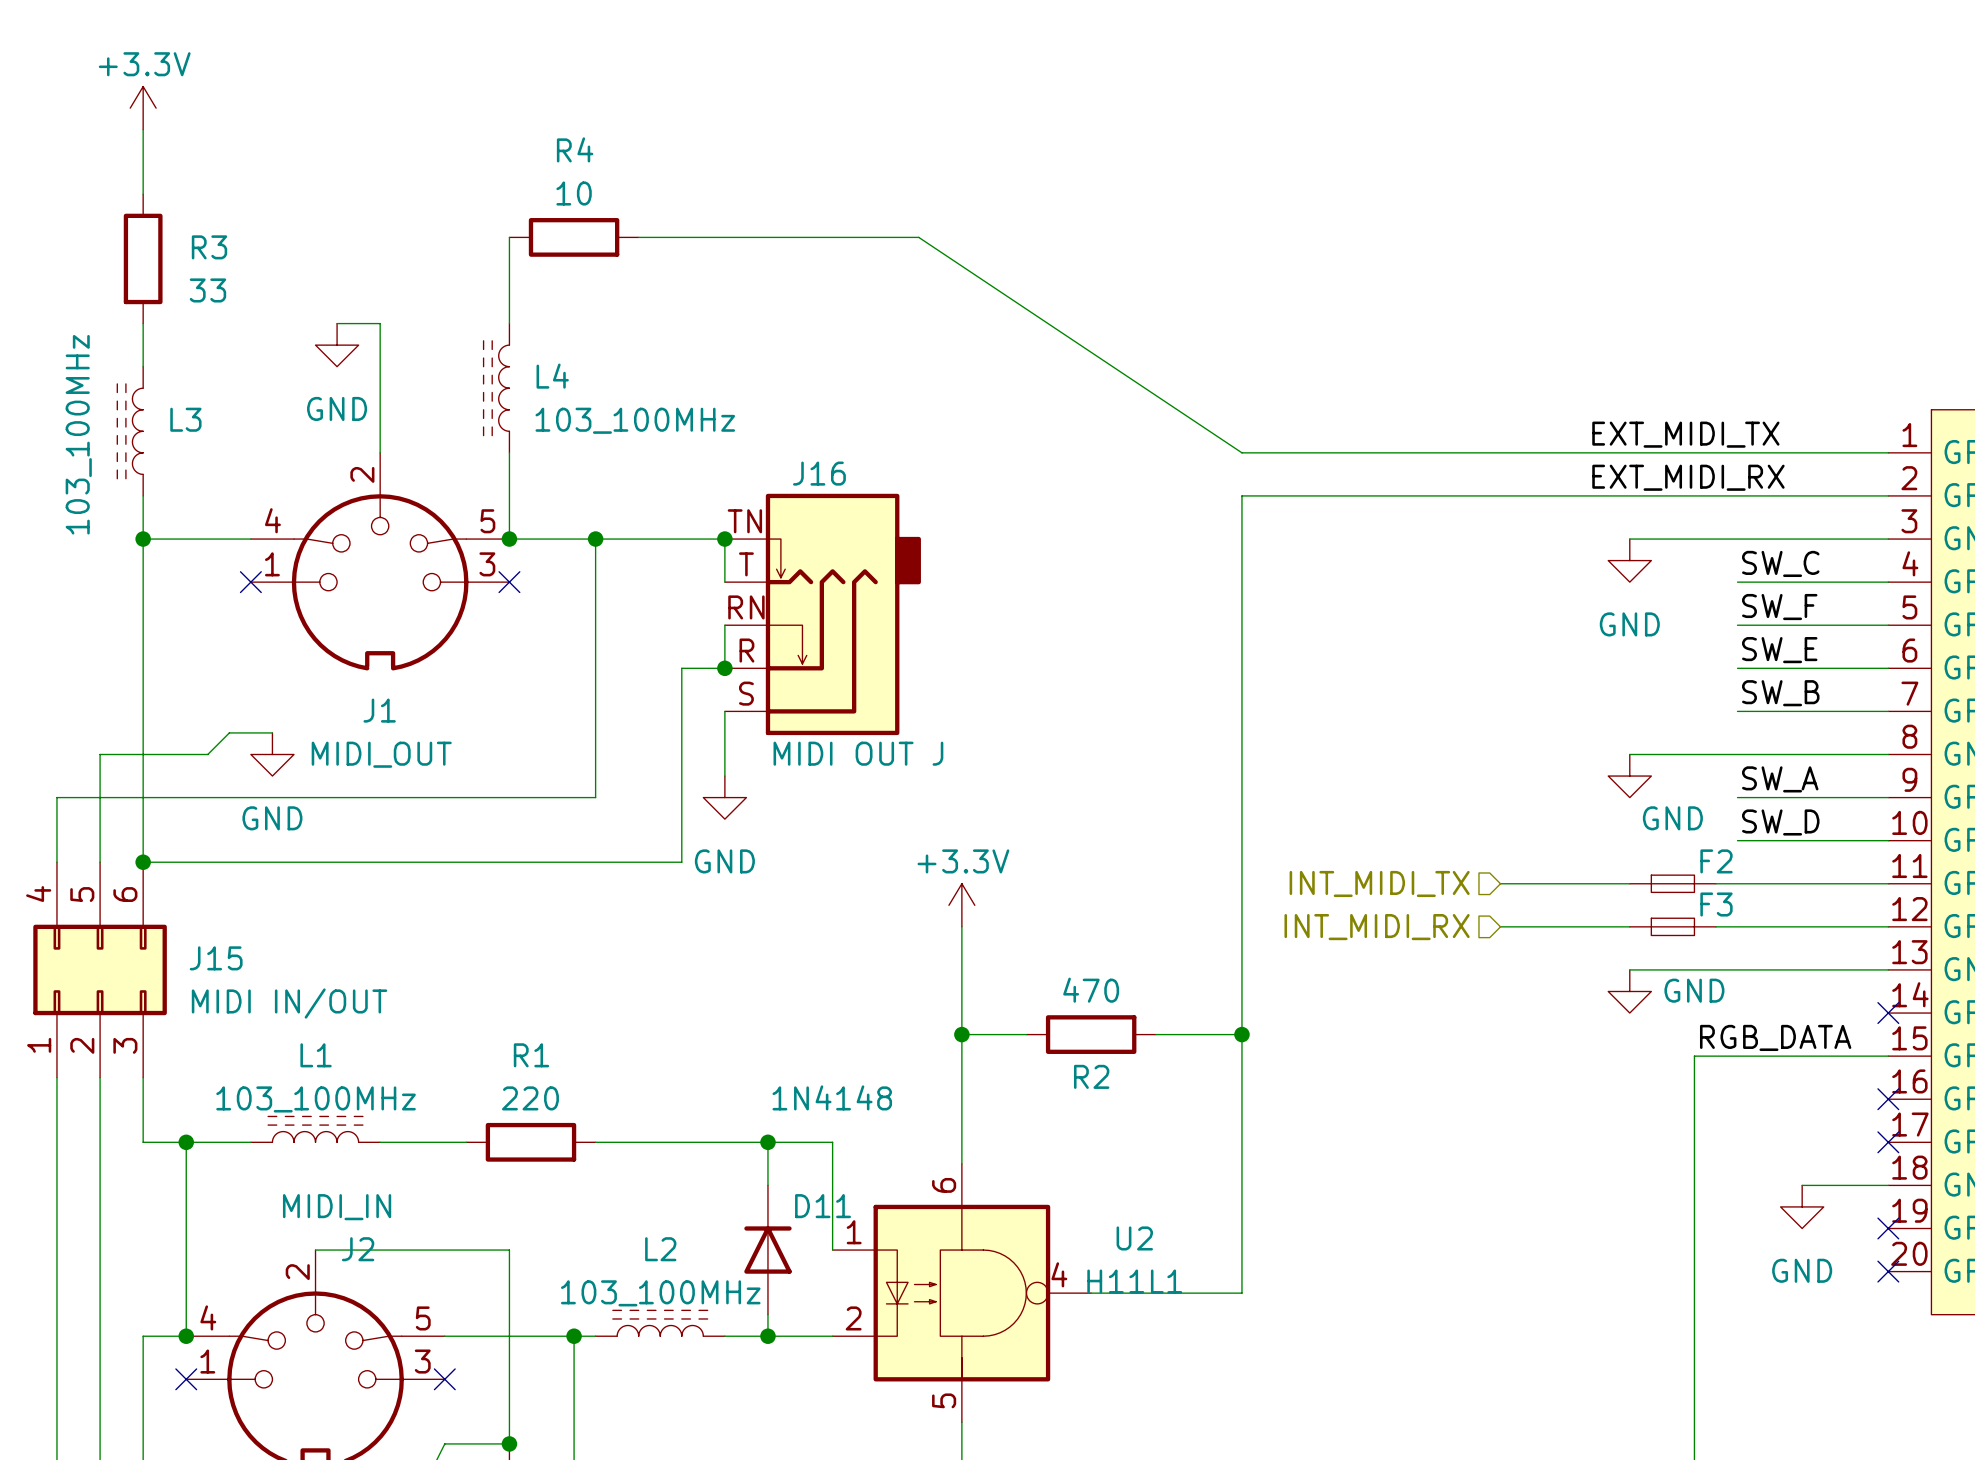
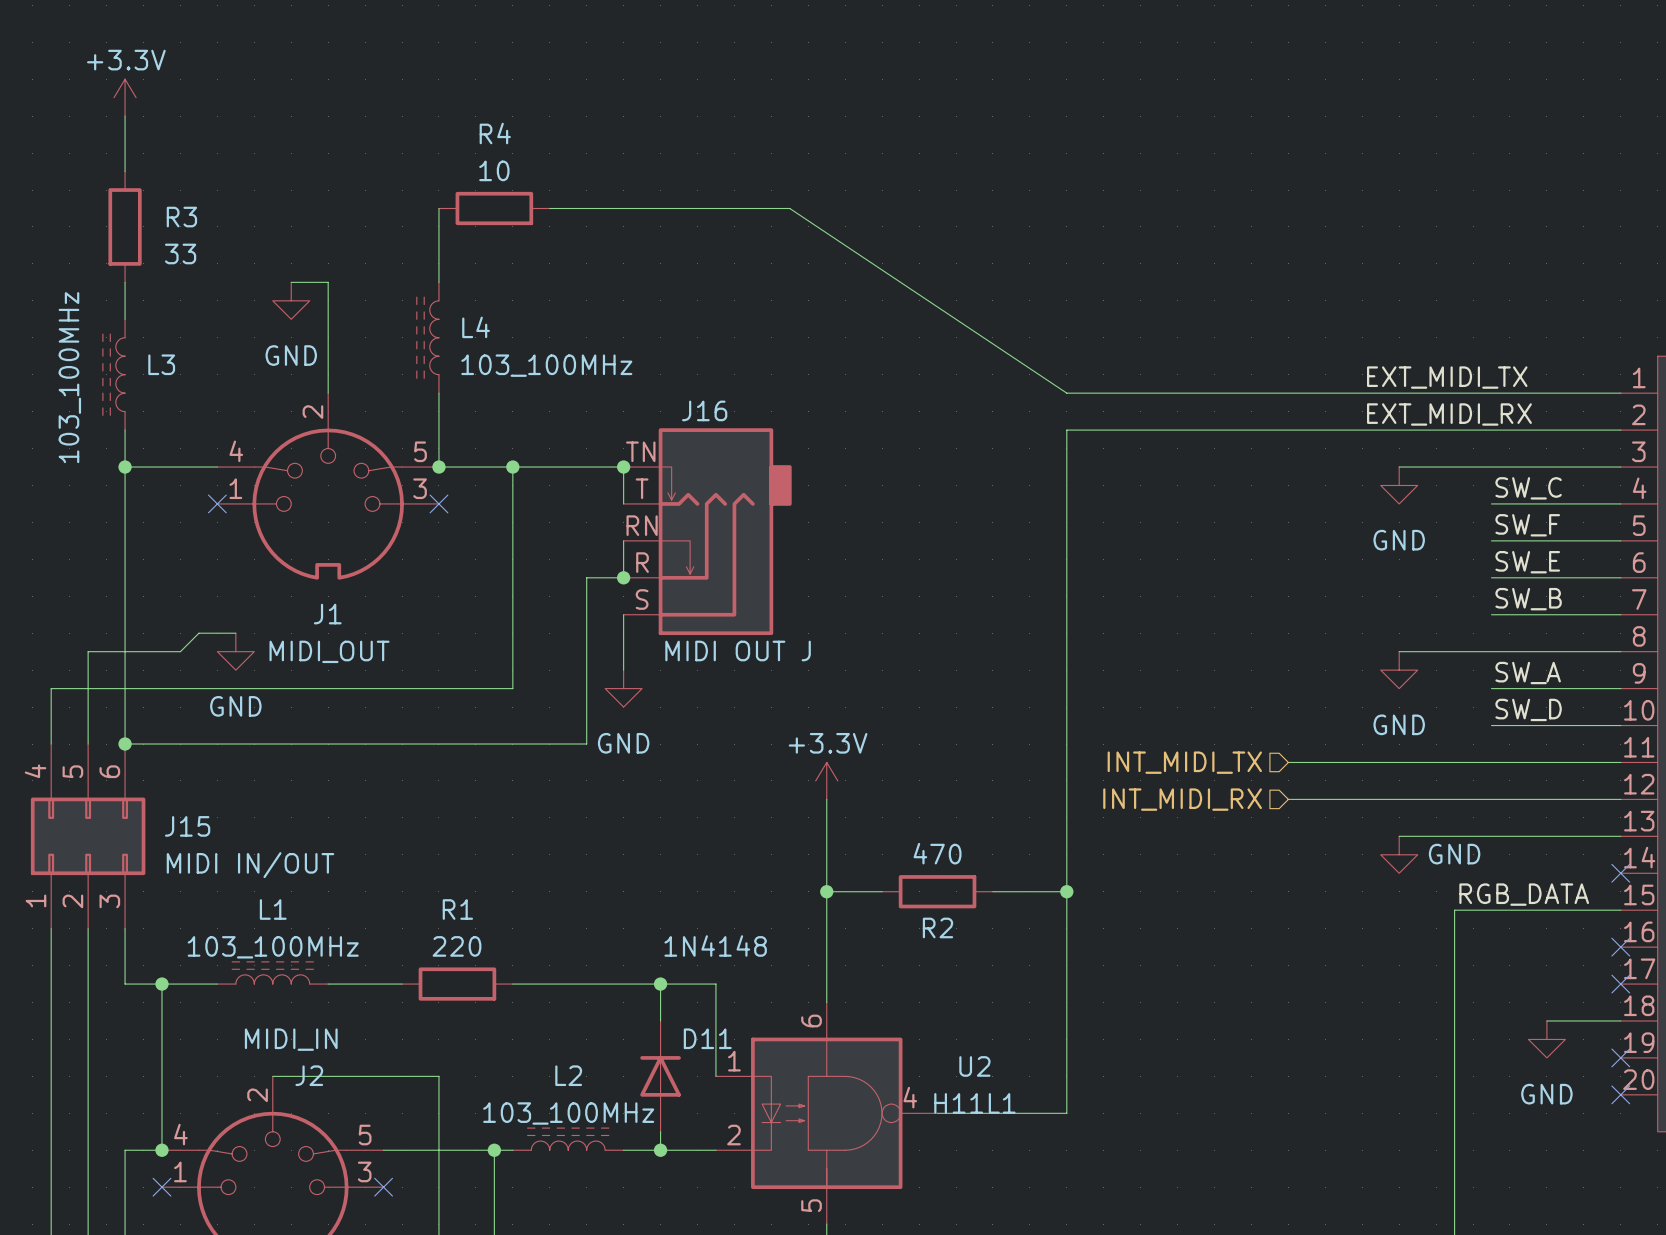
power symbol text position: GND (1672, 818) -> GND (1399, 724)
F2: (1672, 883) -> none
F3: (1672, 926) -> none

